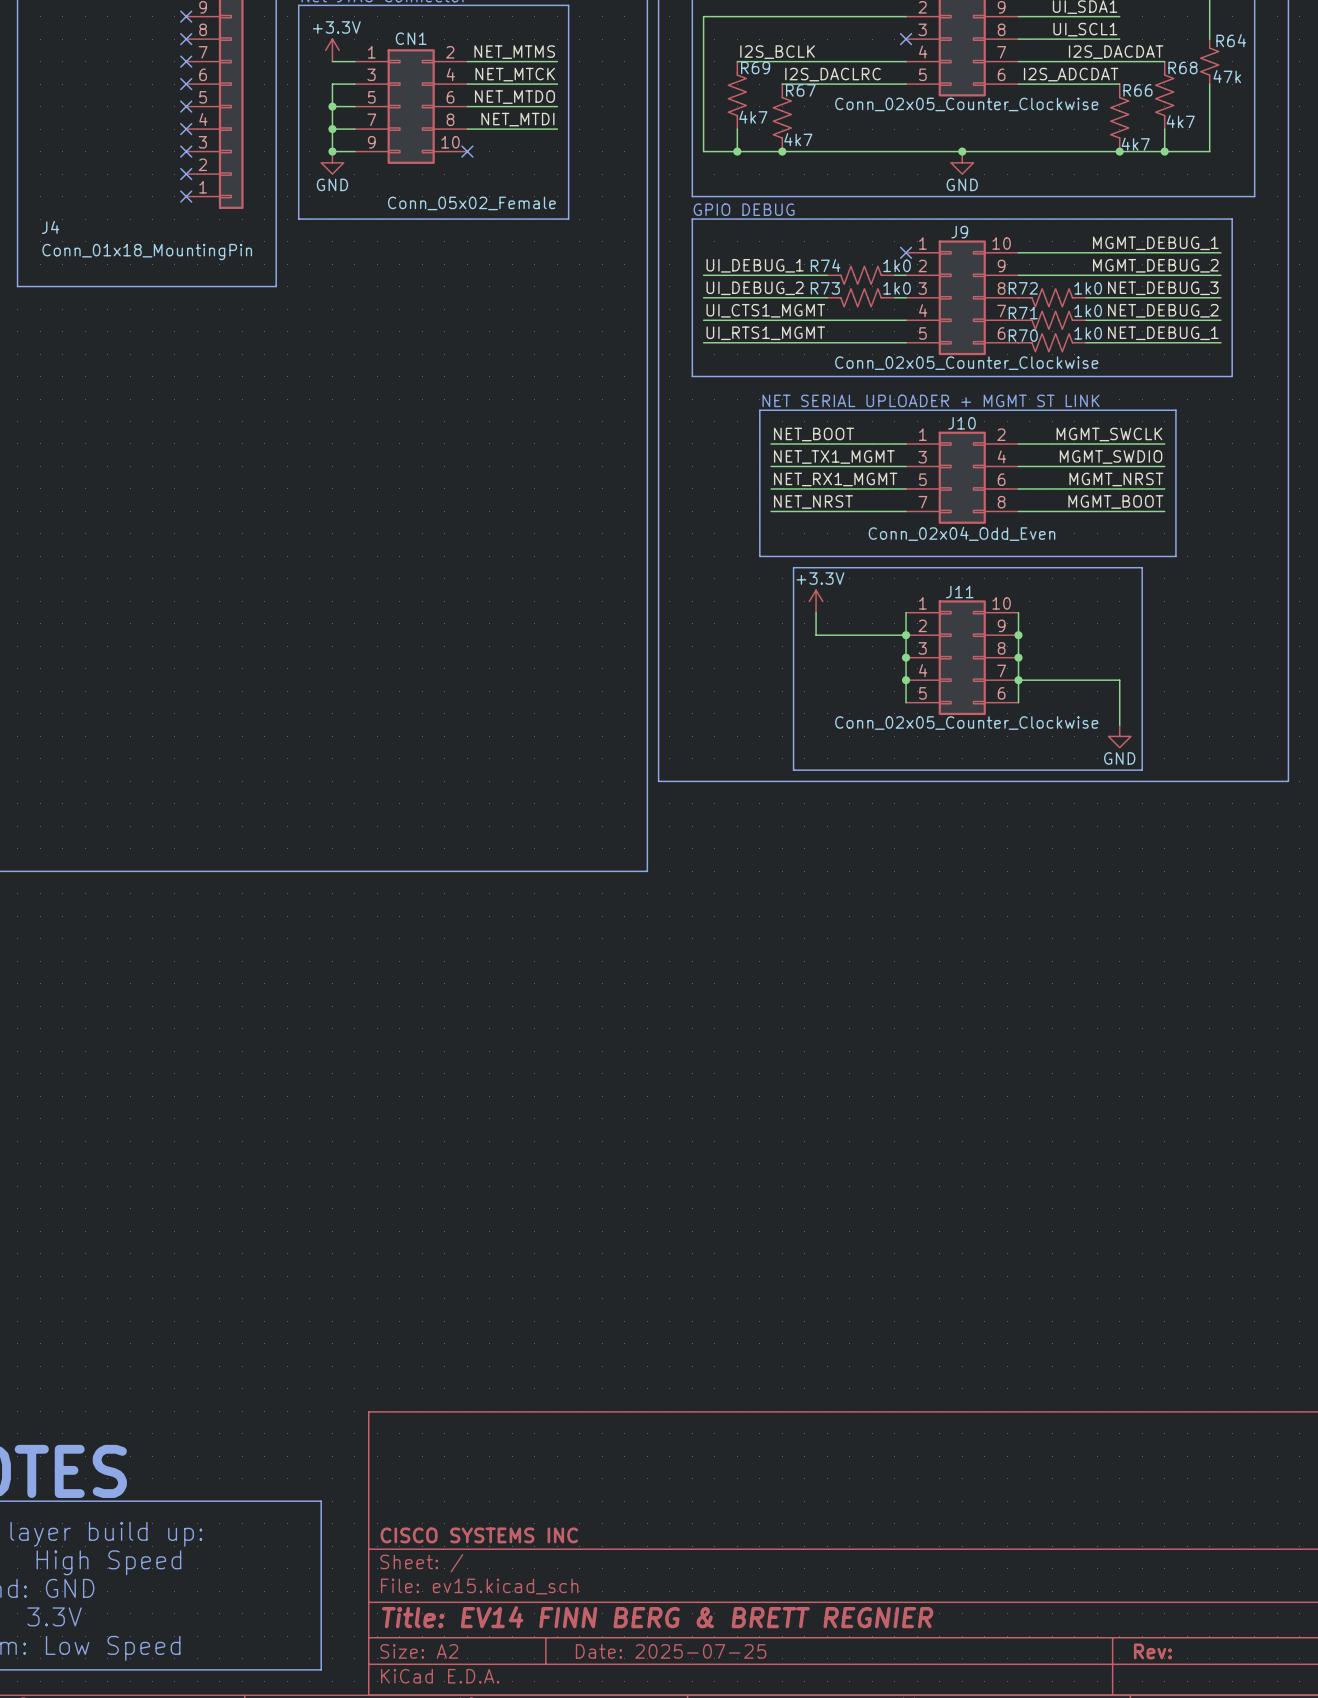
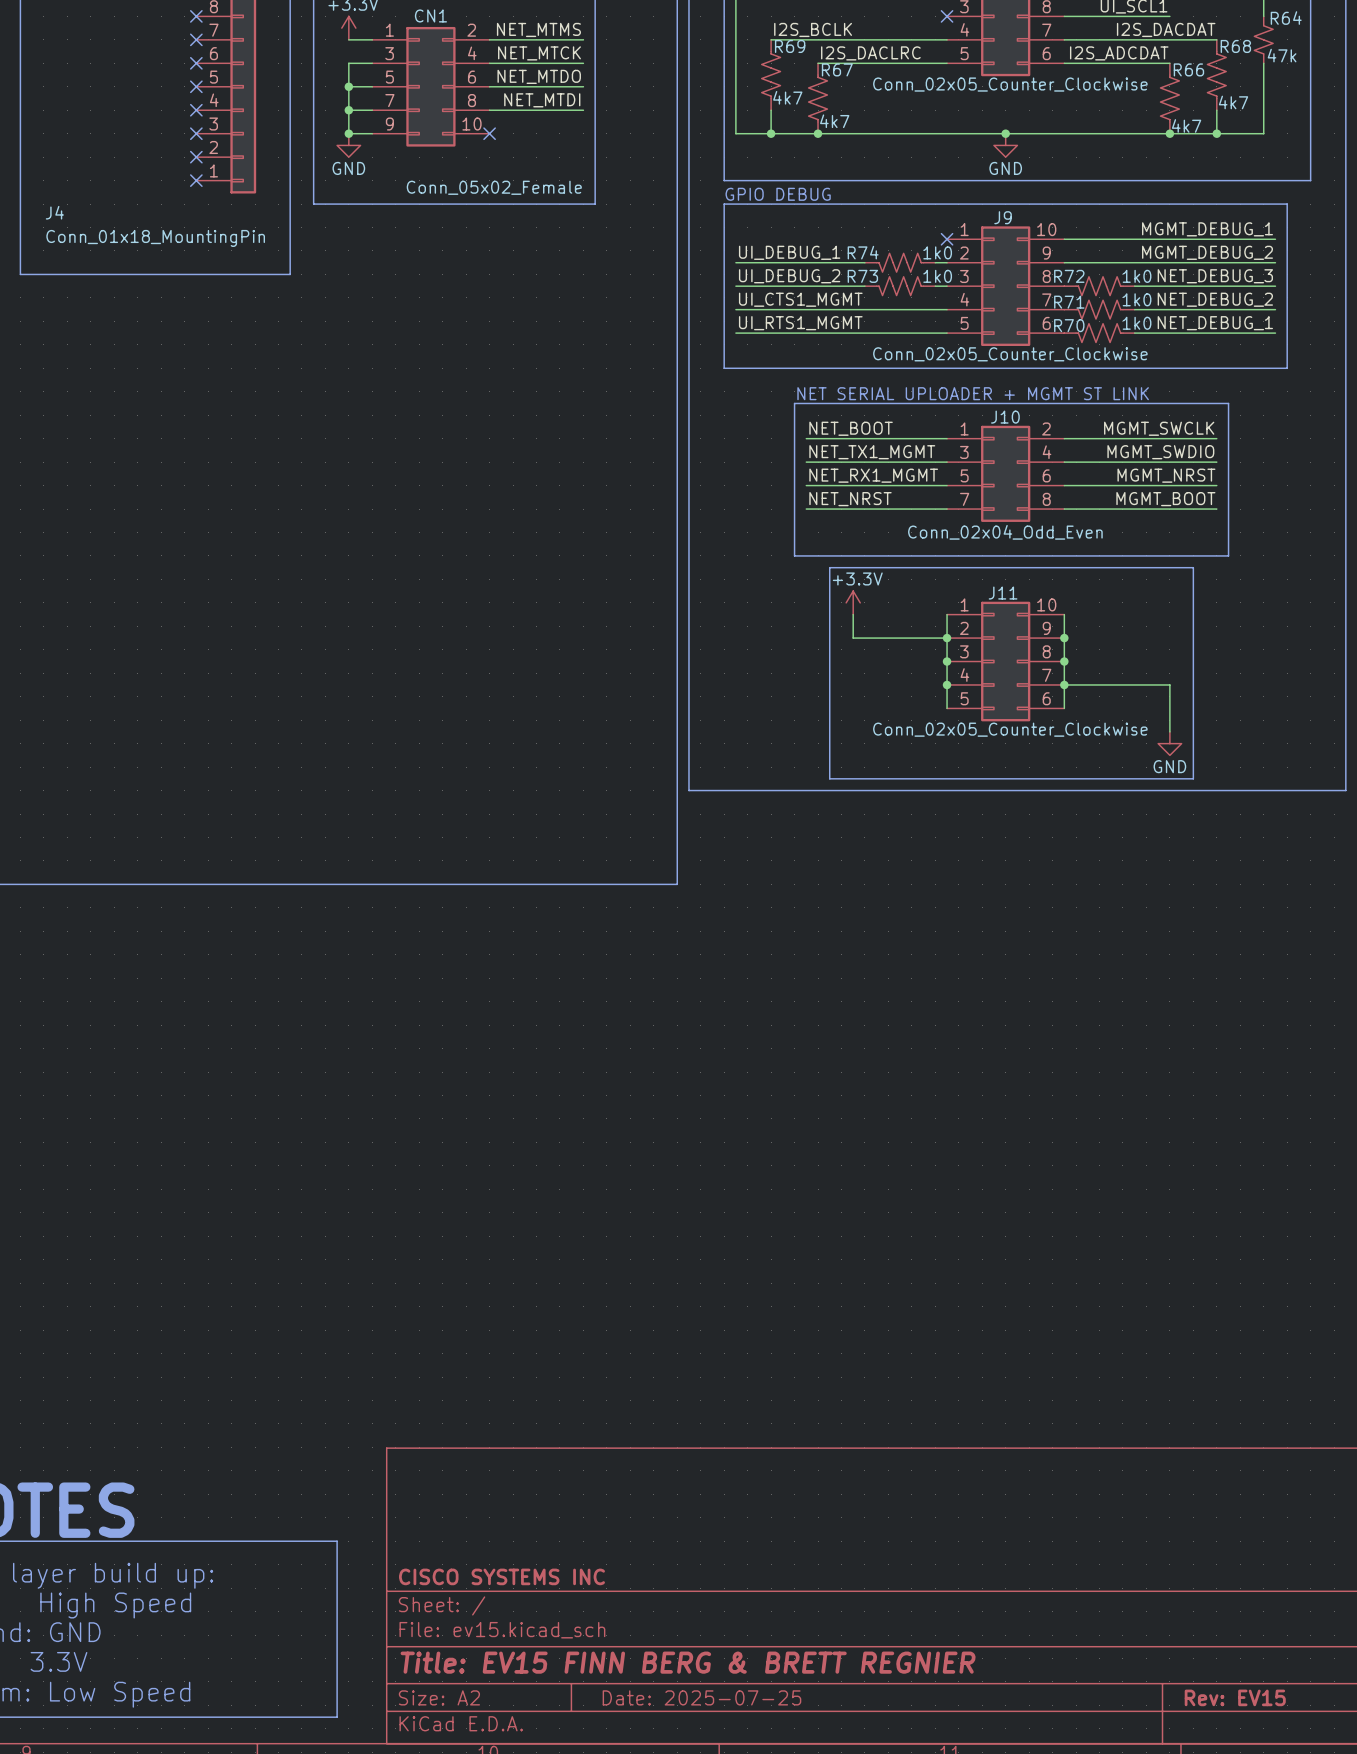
title block: Title: EV14 FINN BERG & BRETT REGNIER (657, 1617) -> Title: EV15 FINN BERG & BRETT REGNIER (688, 1662)
title block: Rev: (1152, 1651) -> Rev: EV15 (1235, 1697)

